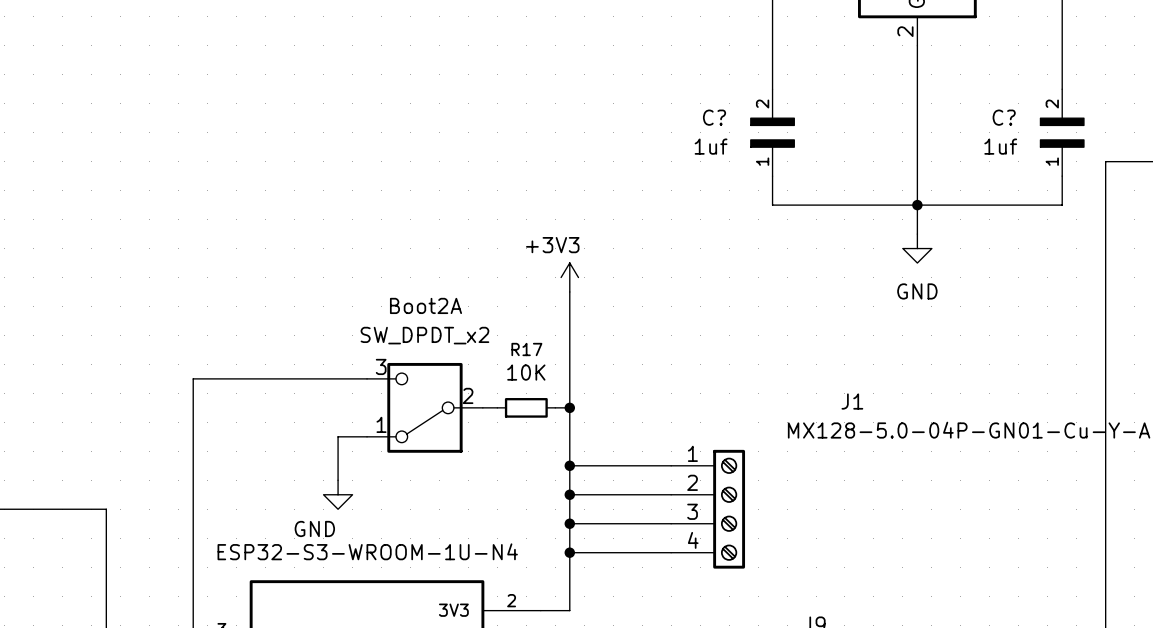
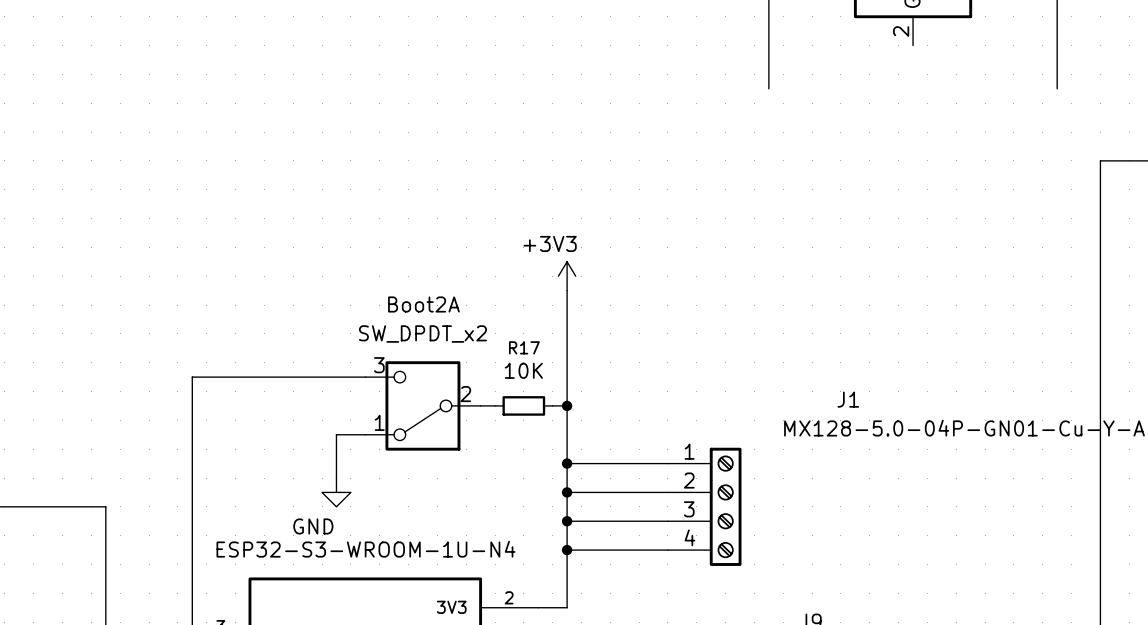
wire: (917, 45) (917, 234) -> none
C?: 1uf (772, 132) -> none
C?: 1uf (1062, 132) -> none
wire: (772, 176) (772, 205) (1062, 205) (1062, 176) -> none
junction: (917, 205) -> none
power symbol: GND (917, 248) -> none

